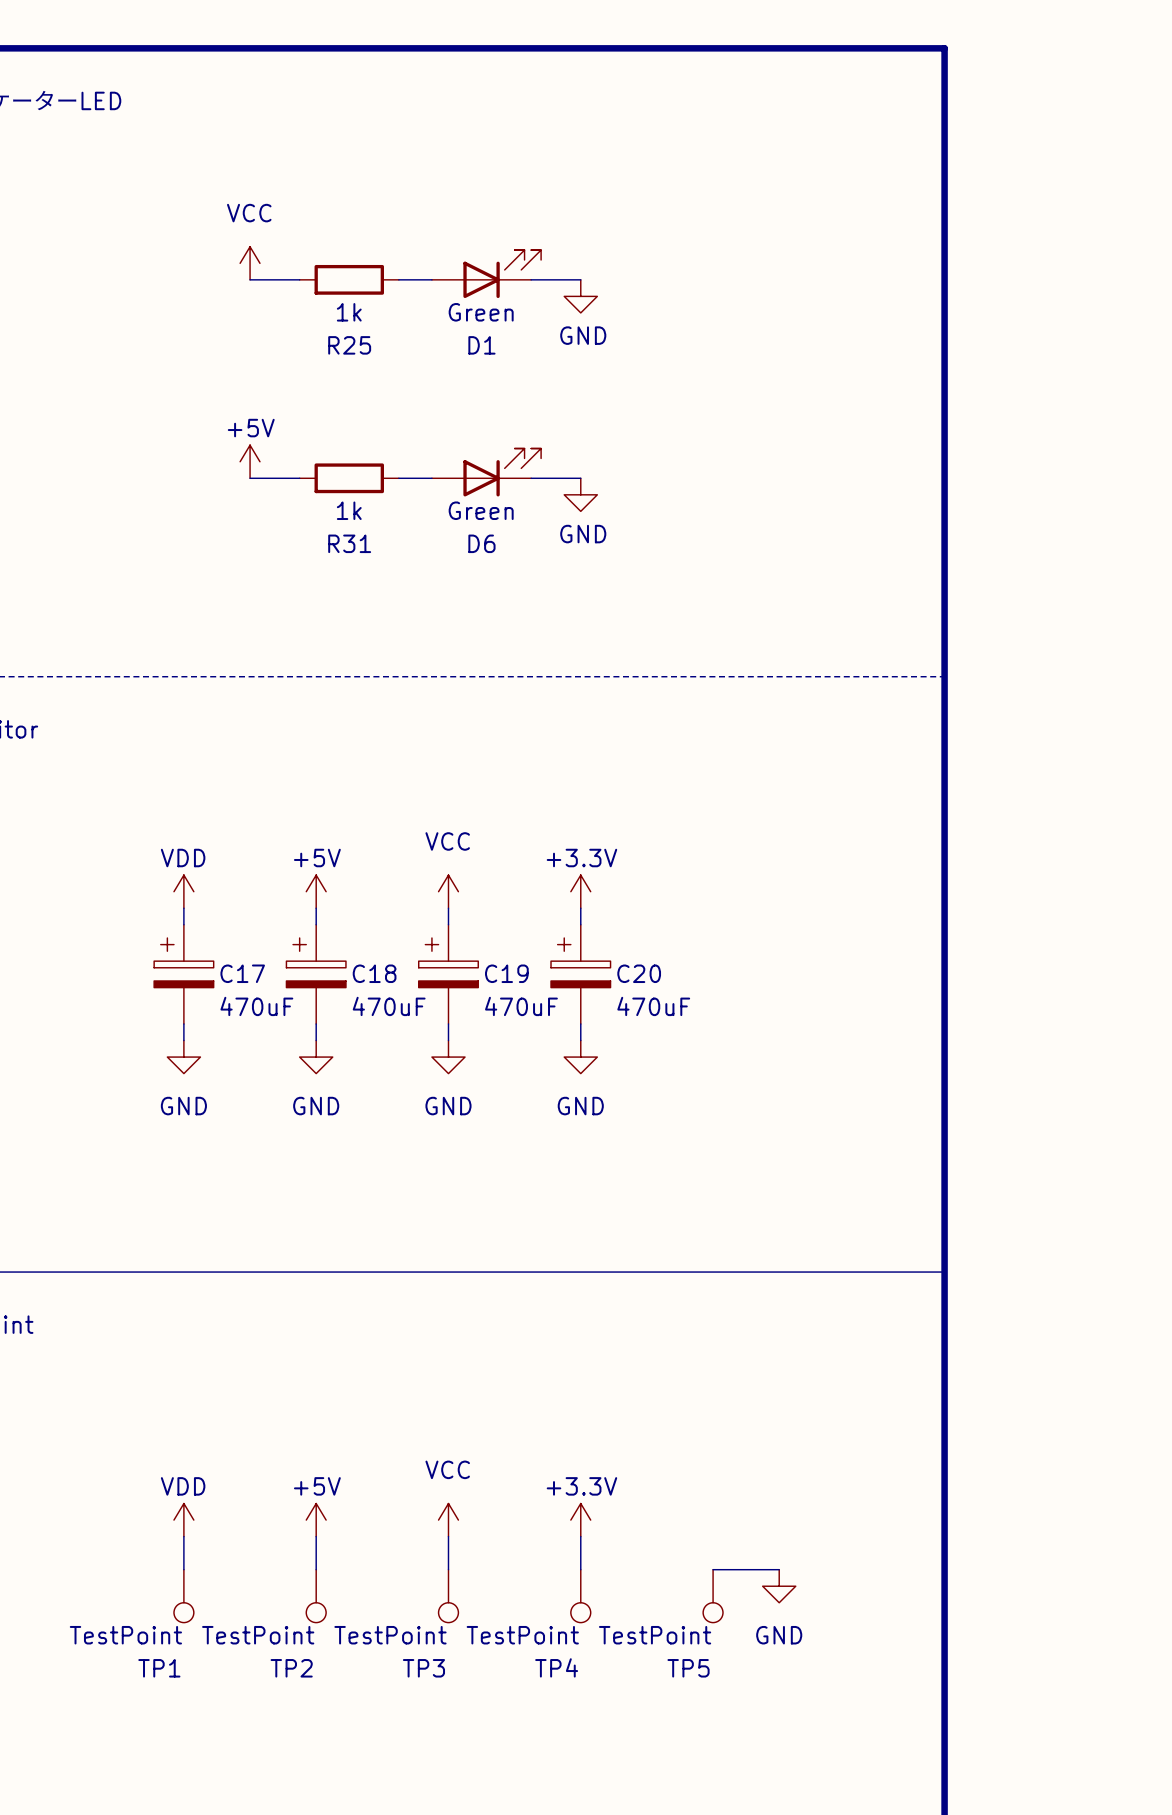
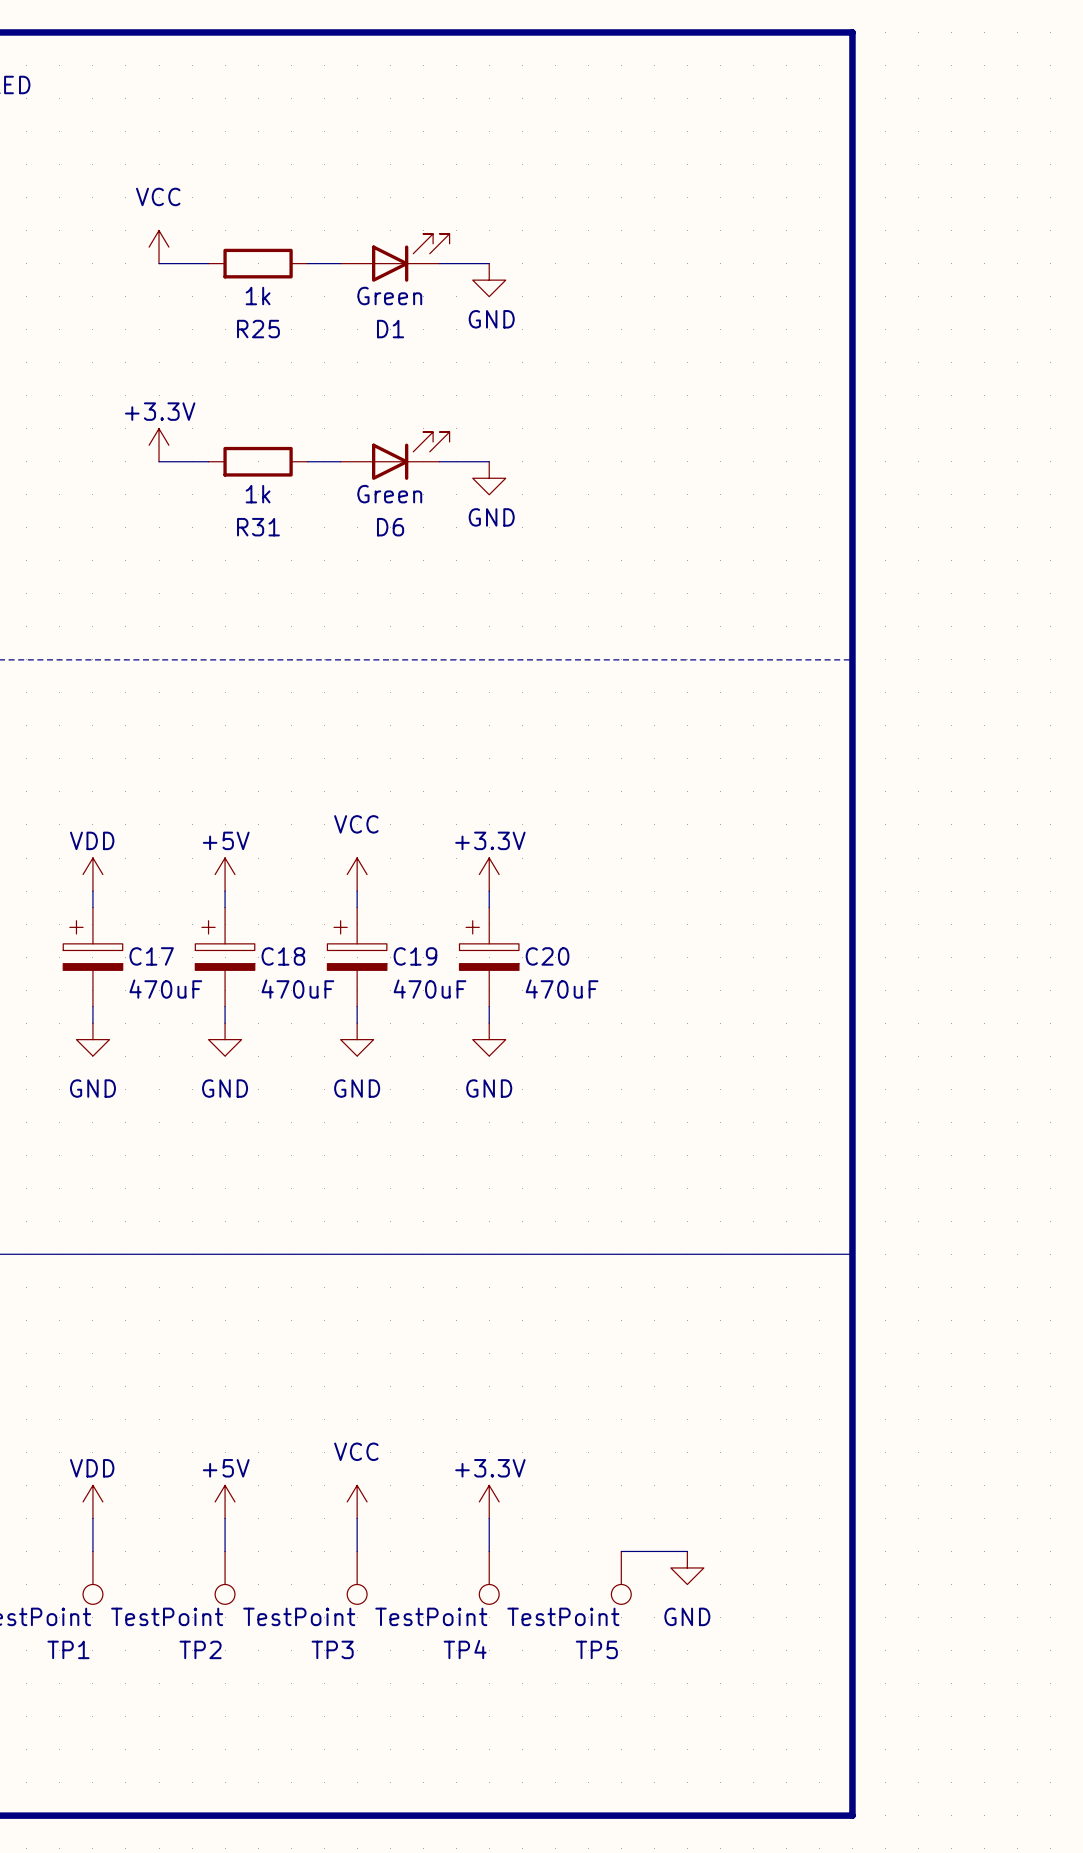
power symbol: +5V (250, 461) -> +3.3V (159, 445)

